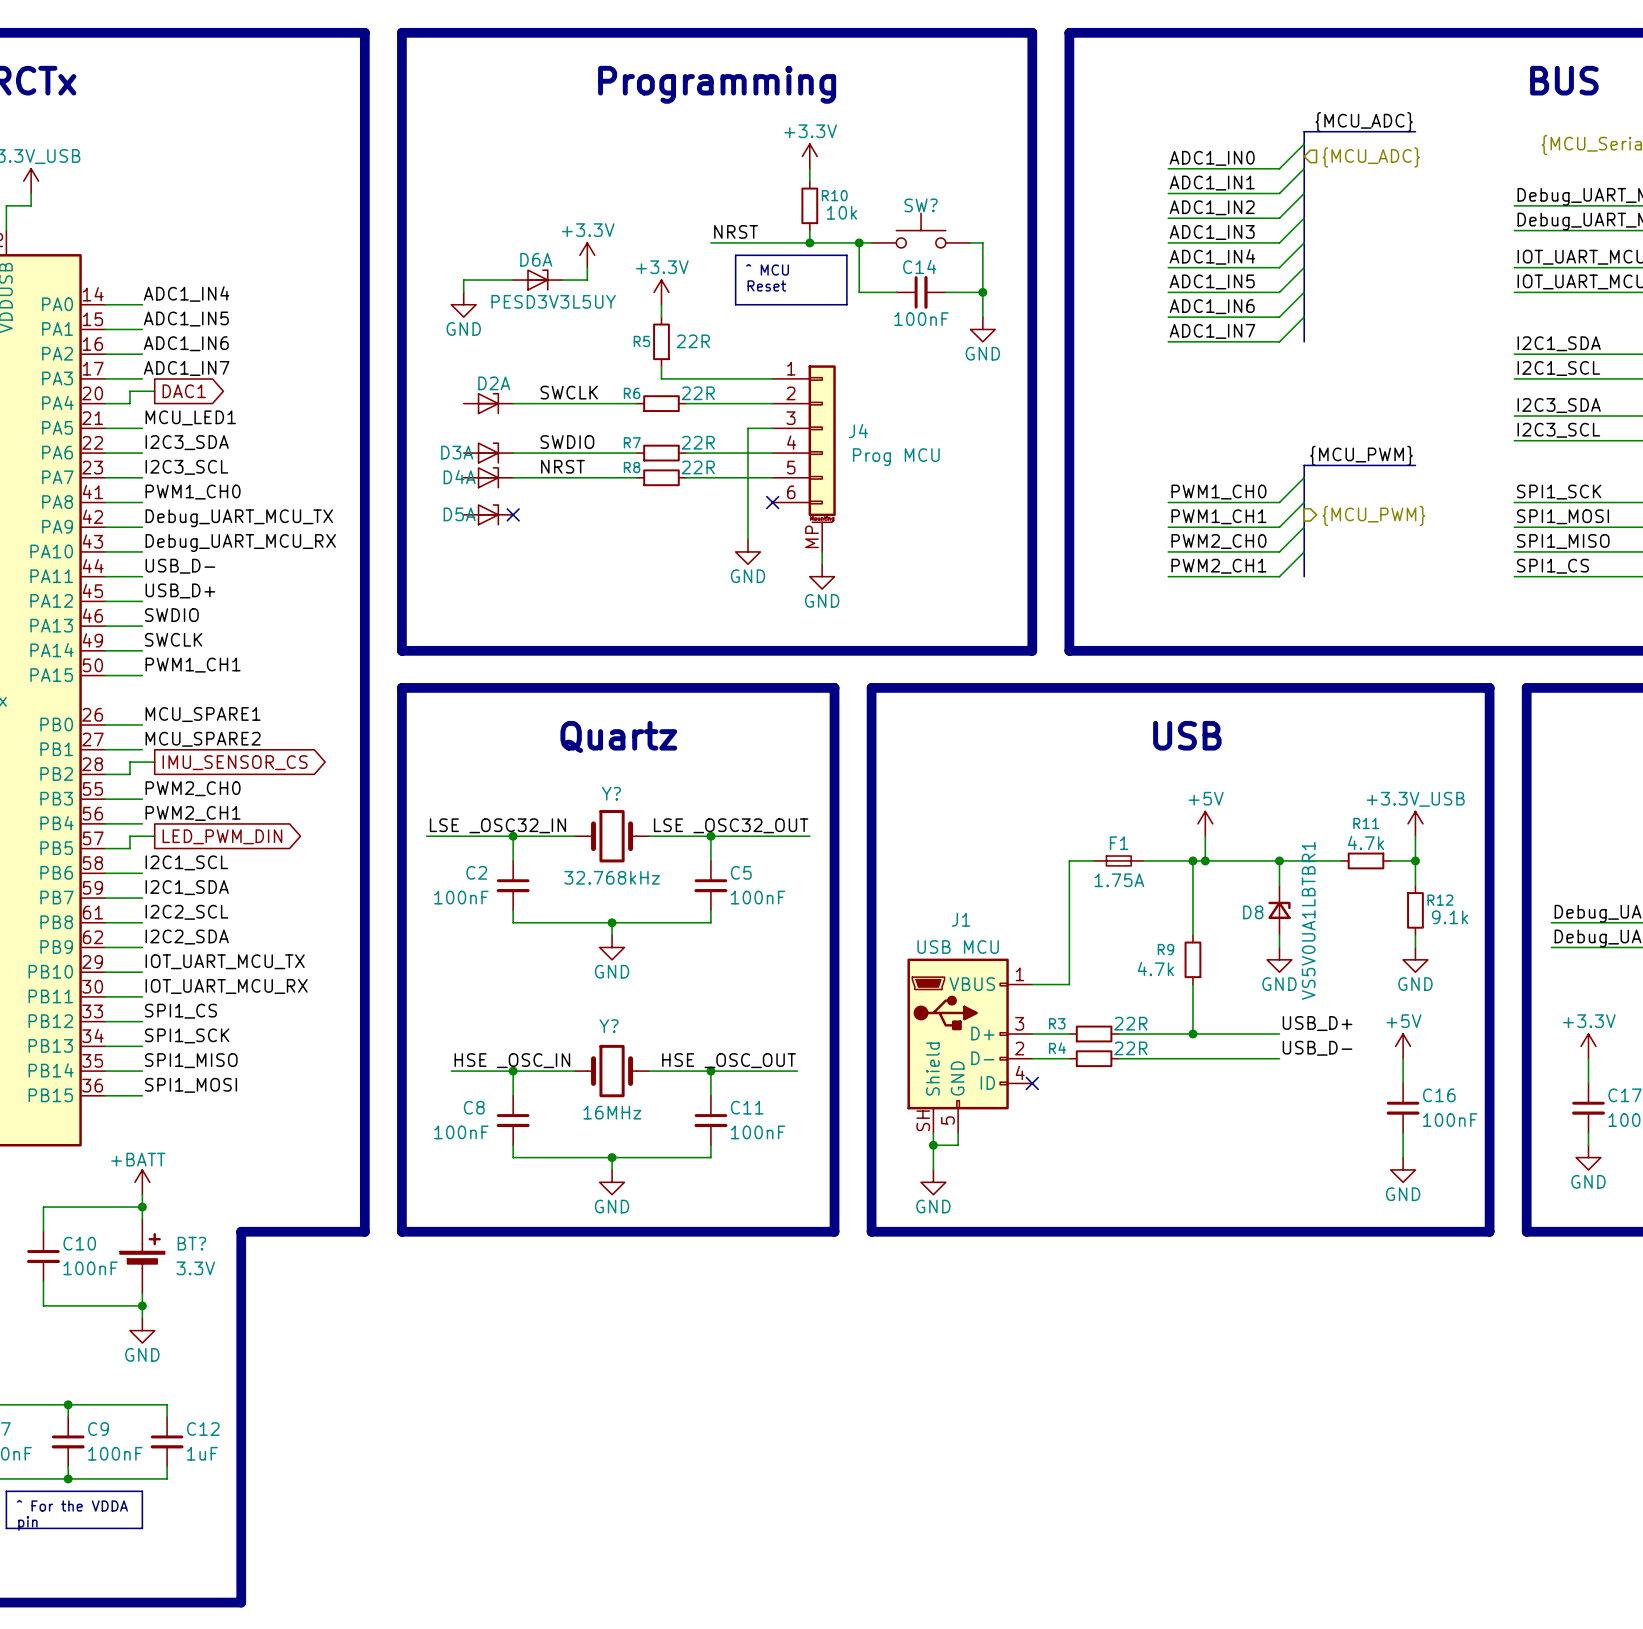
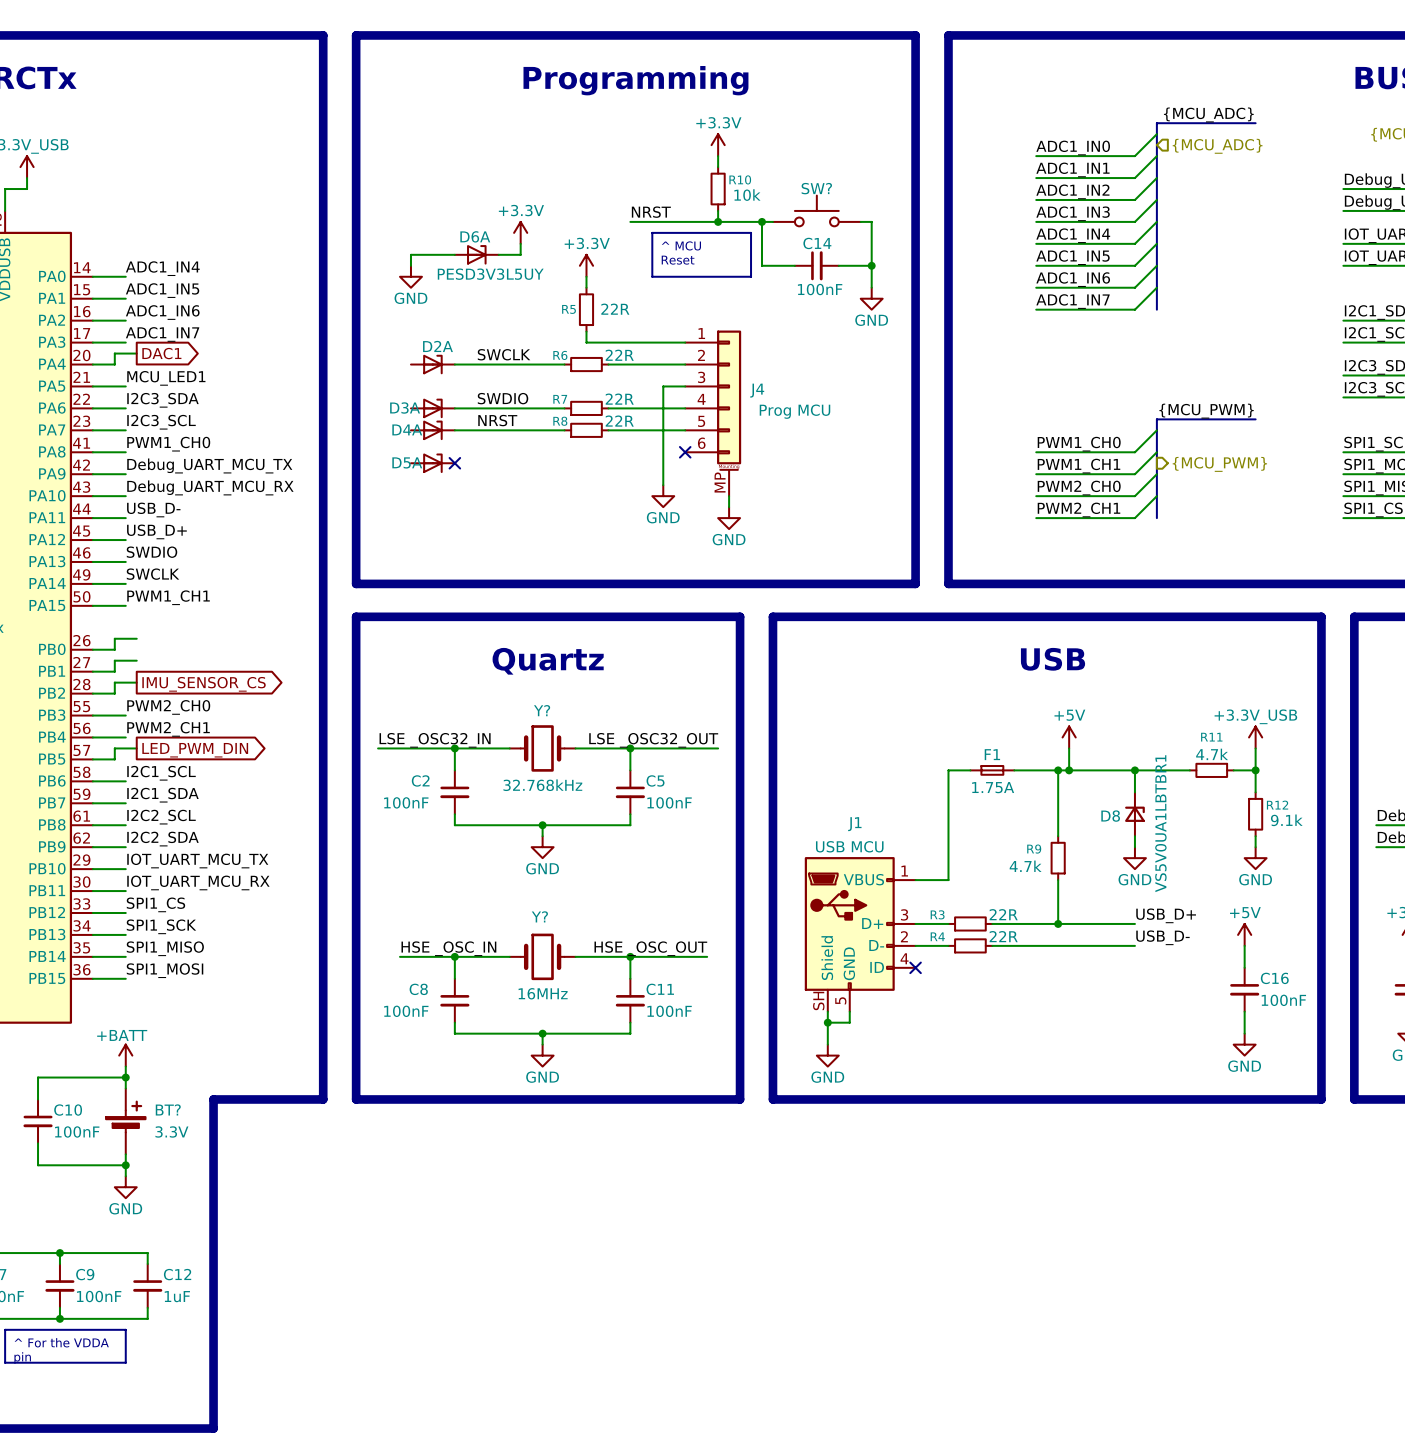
label: MCU_SPARE1 (203, 714) -> none
wire: (130, 724) (142, 724) -> (114, 649) (114, 638) (136, 638)
label: MCU_SPARE2 (203, 739) -> none
wire: (130, 749) (142, 749) -> (114, 671) (114, 660) (136, 660)

